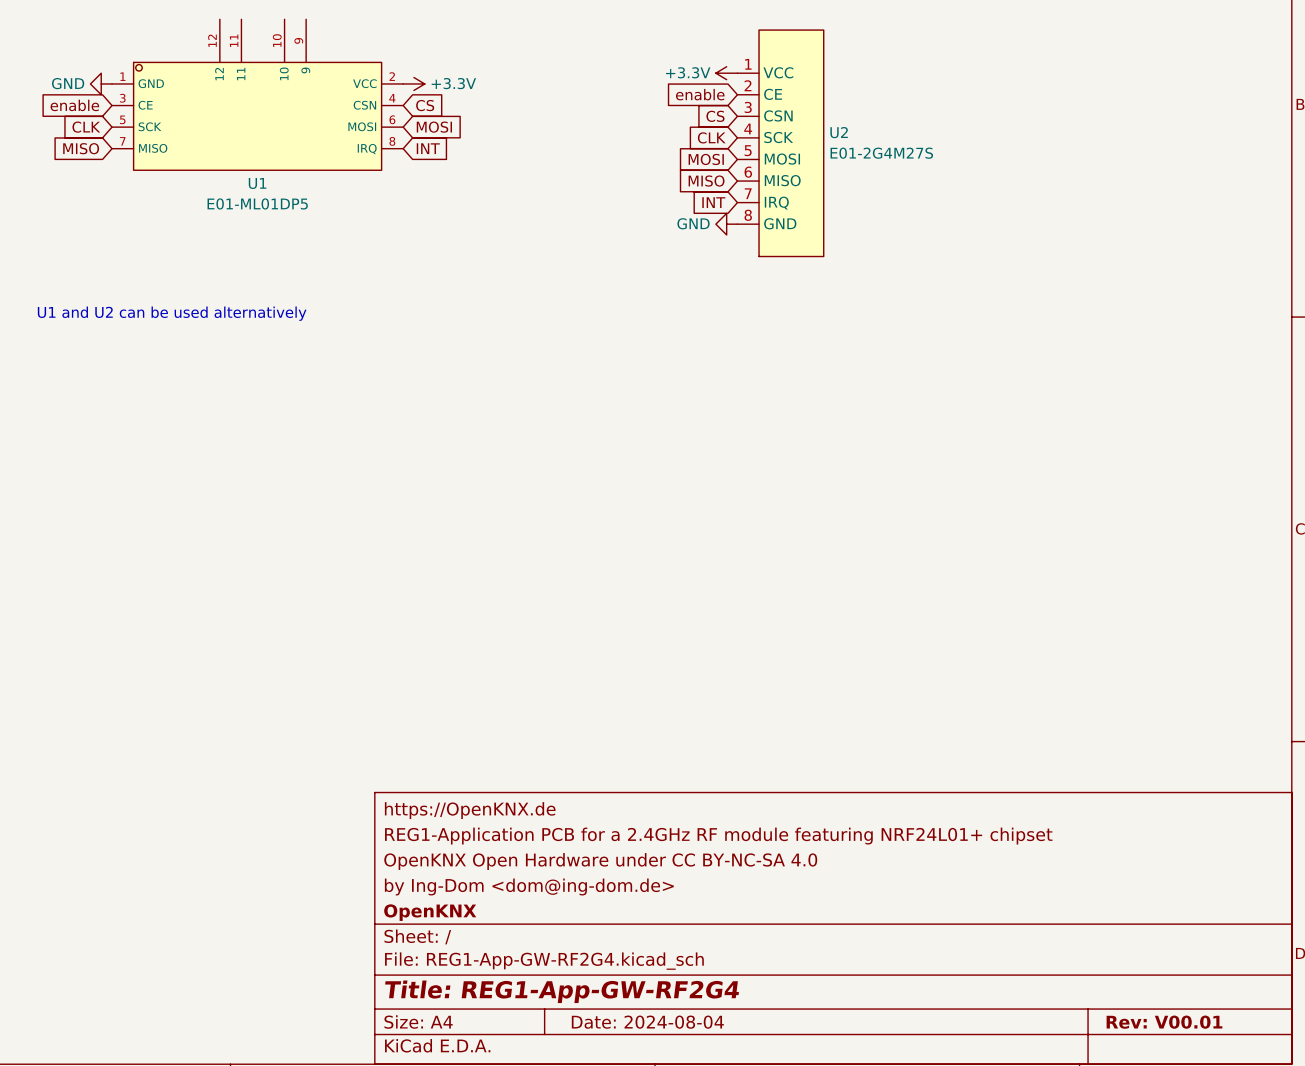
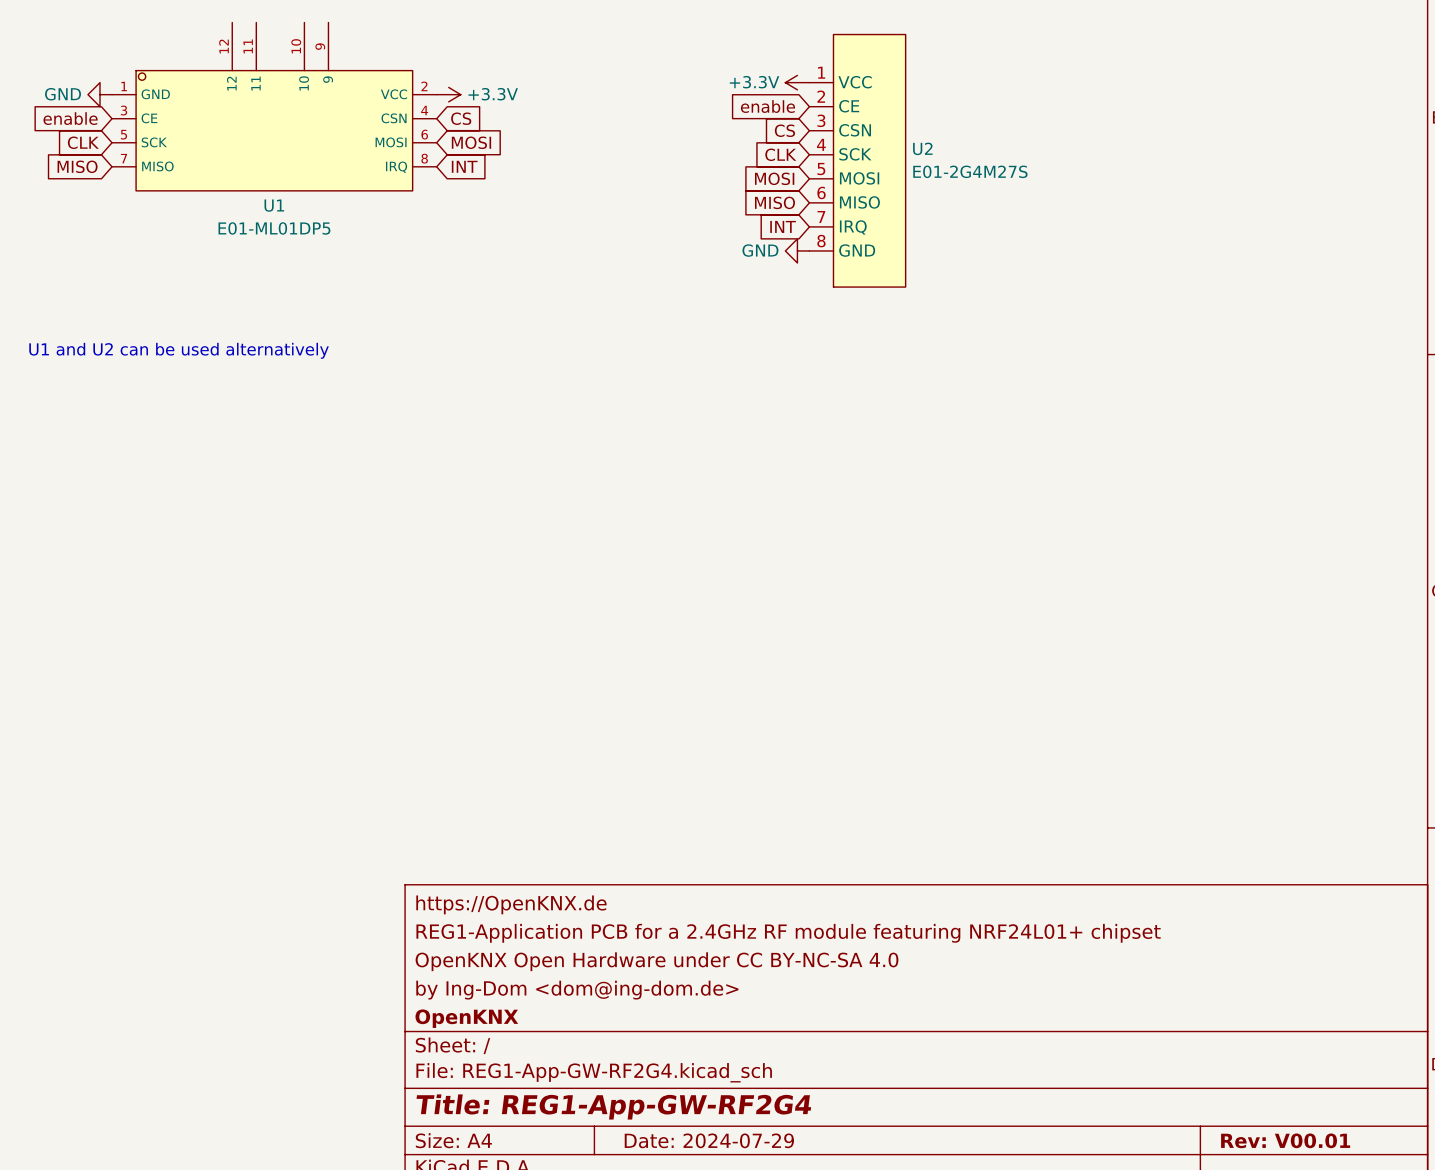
title block: Date: 2024-08-04 (647, 1022) -> Date: 2024-07-29 (709, 1140)

